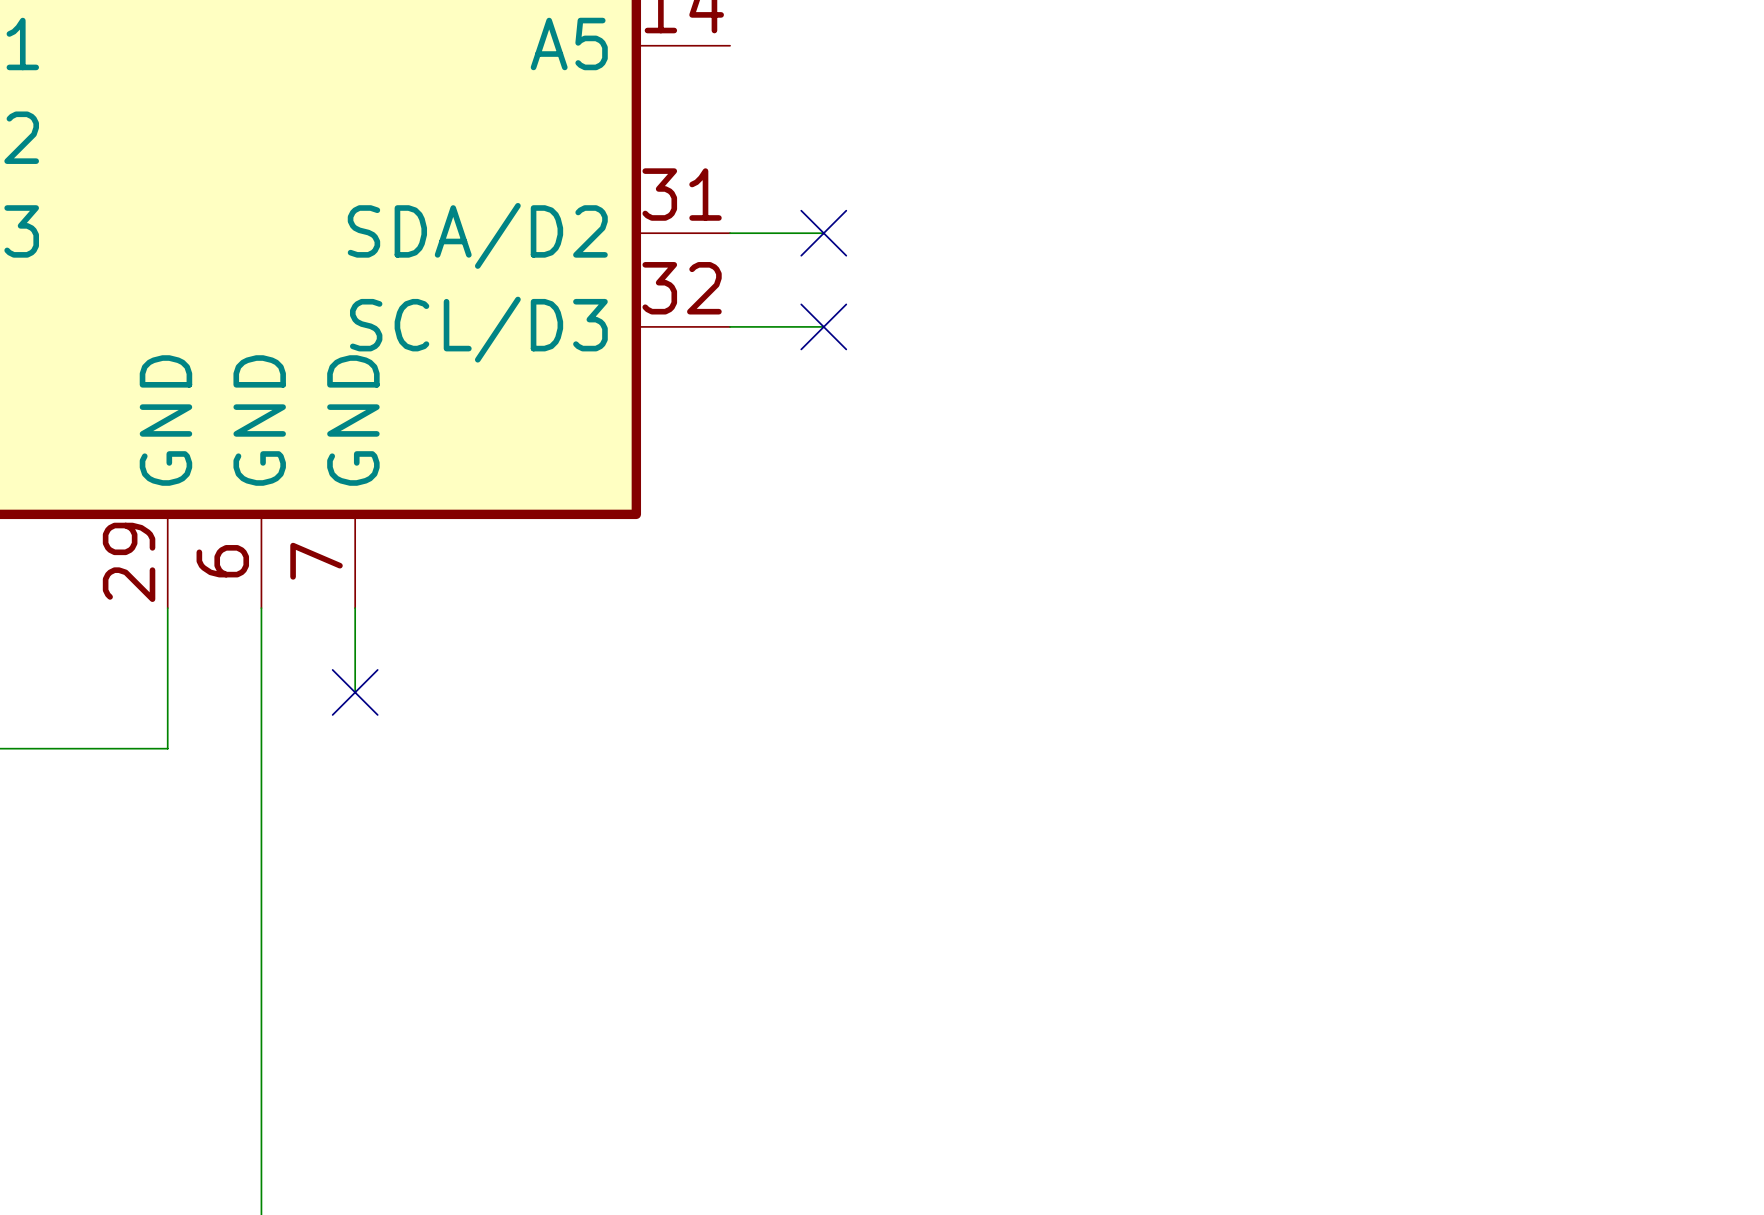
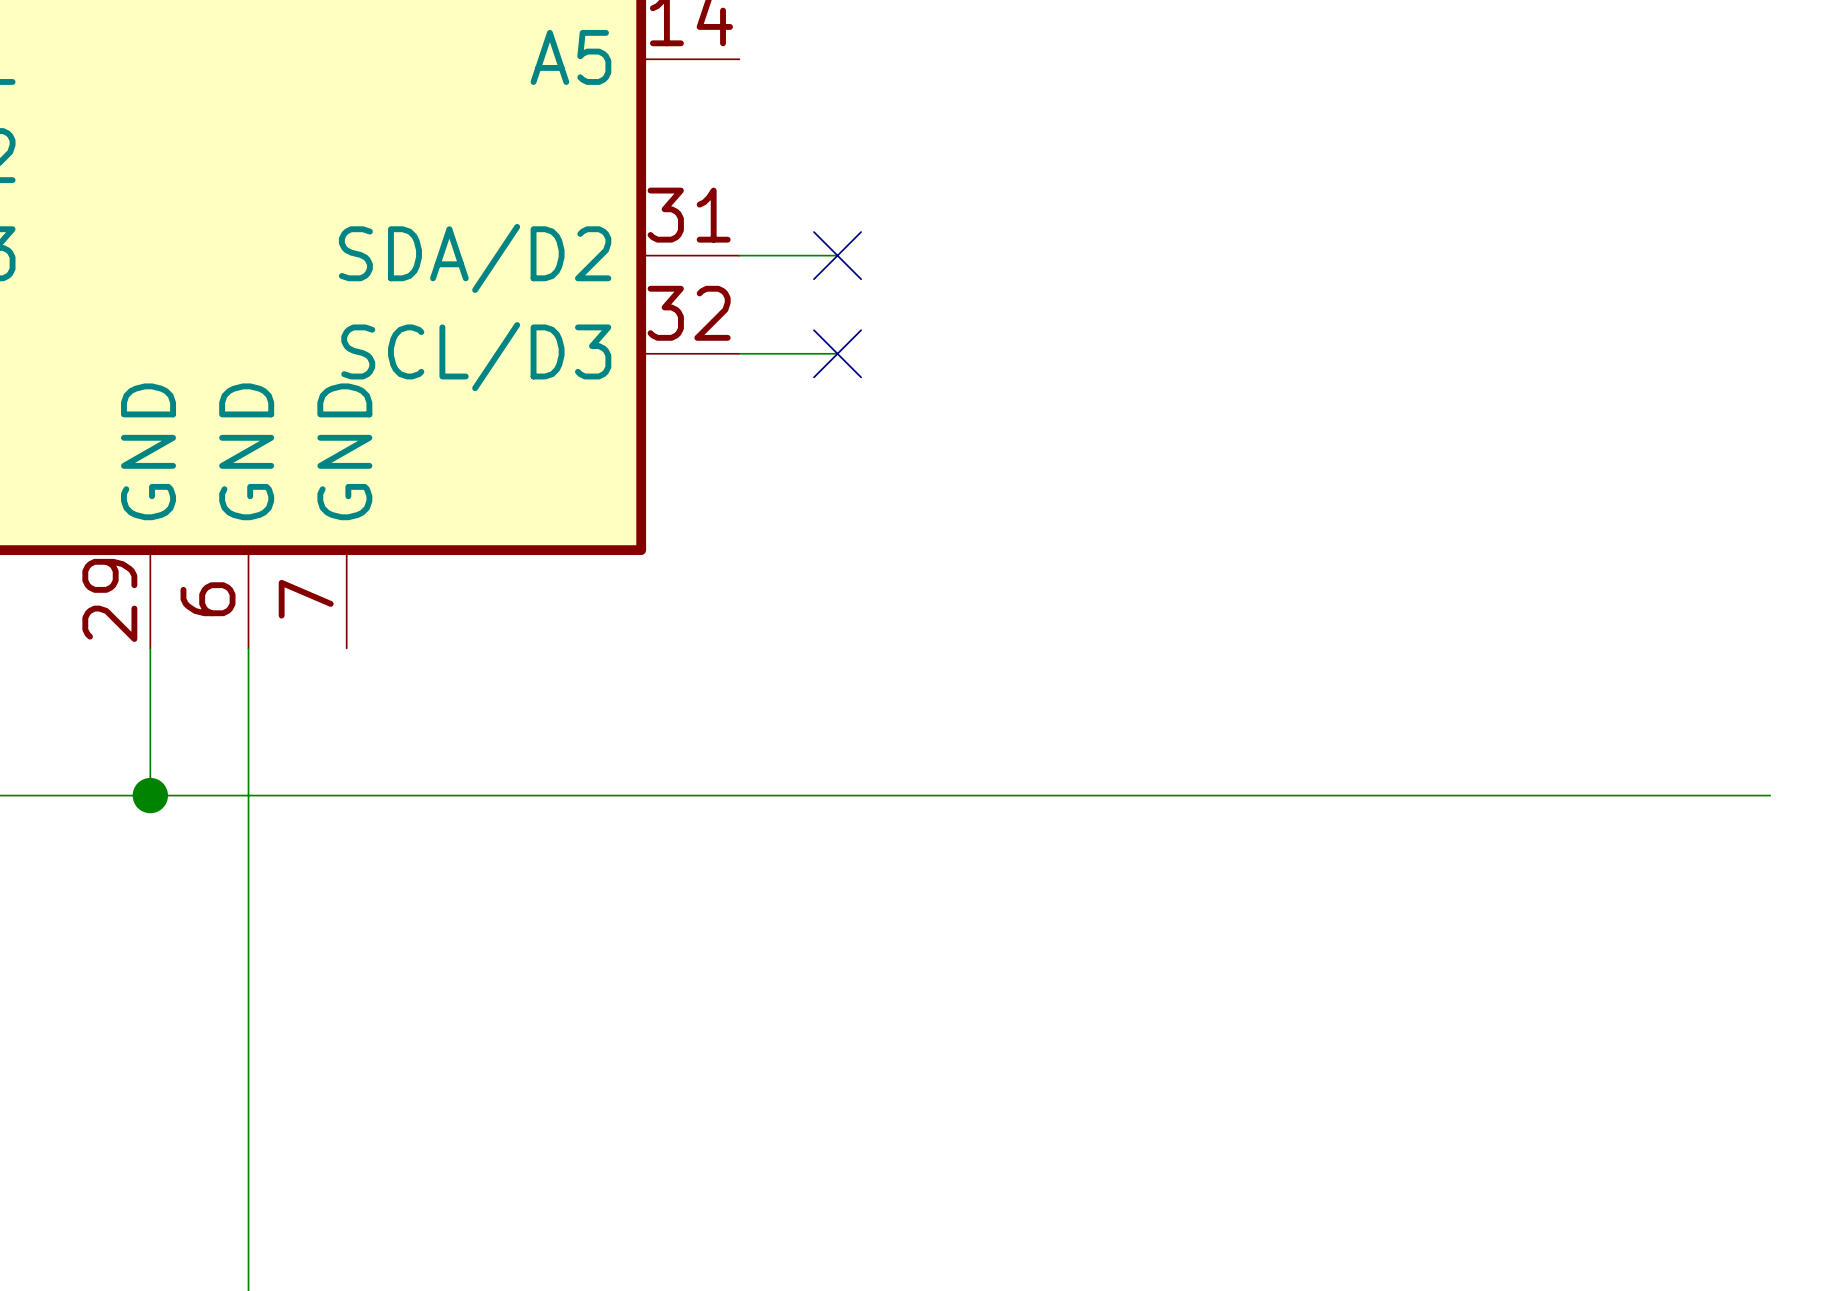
wire: (355, 608) (355, 692) -> none
no-connect mark: (355, 692) -> none
wire: none -> (150, 795) (1770, 795)
junction: none -> (150, 795)

